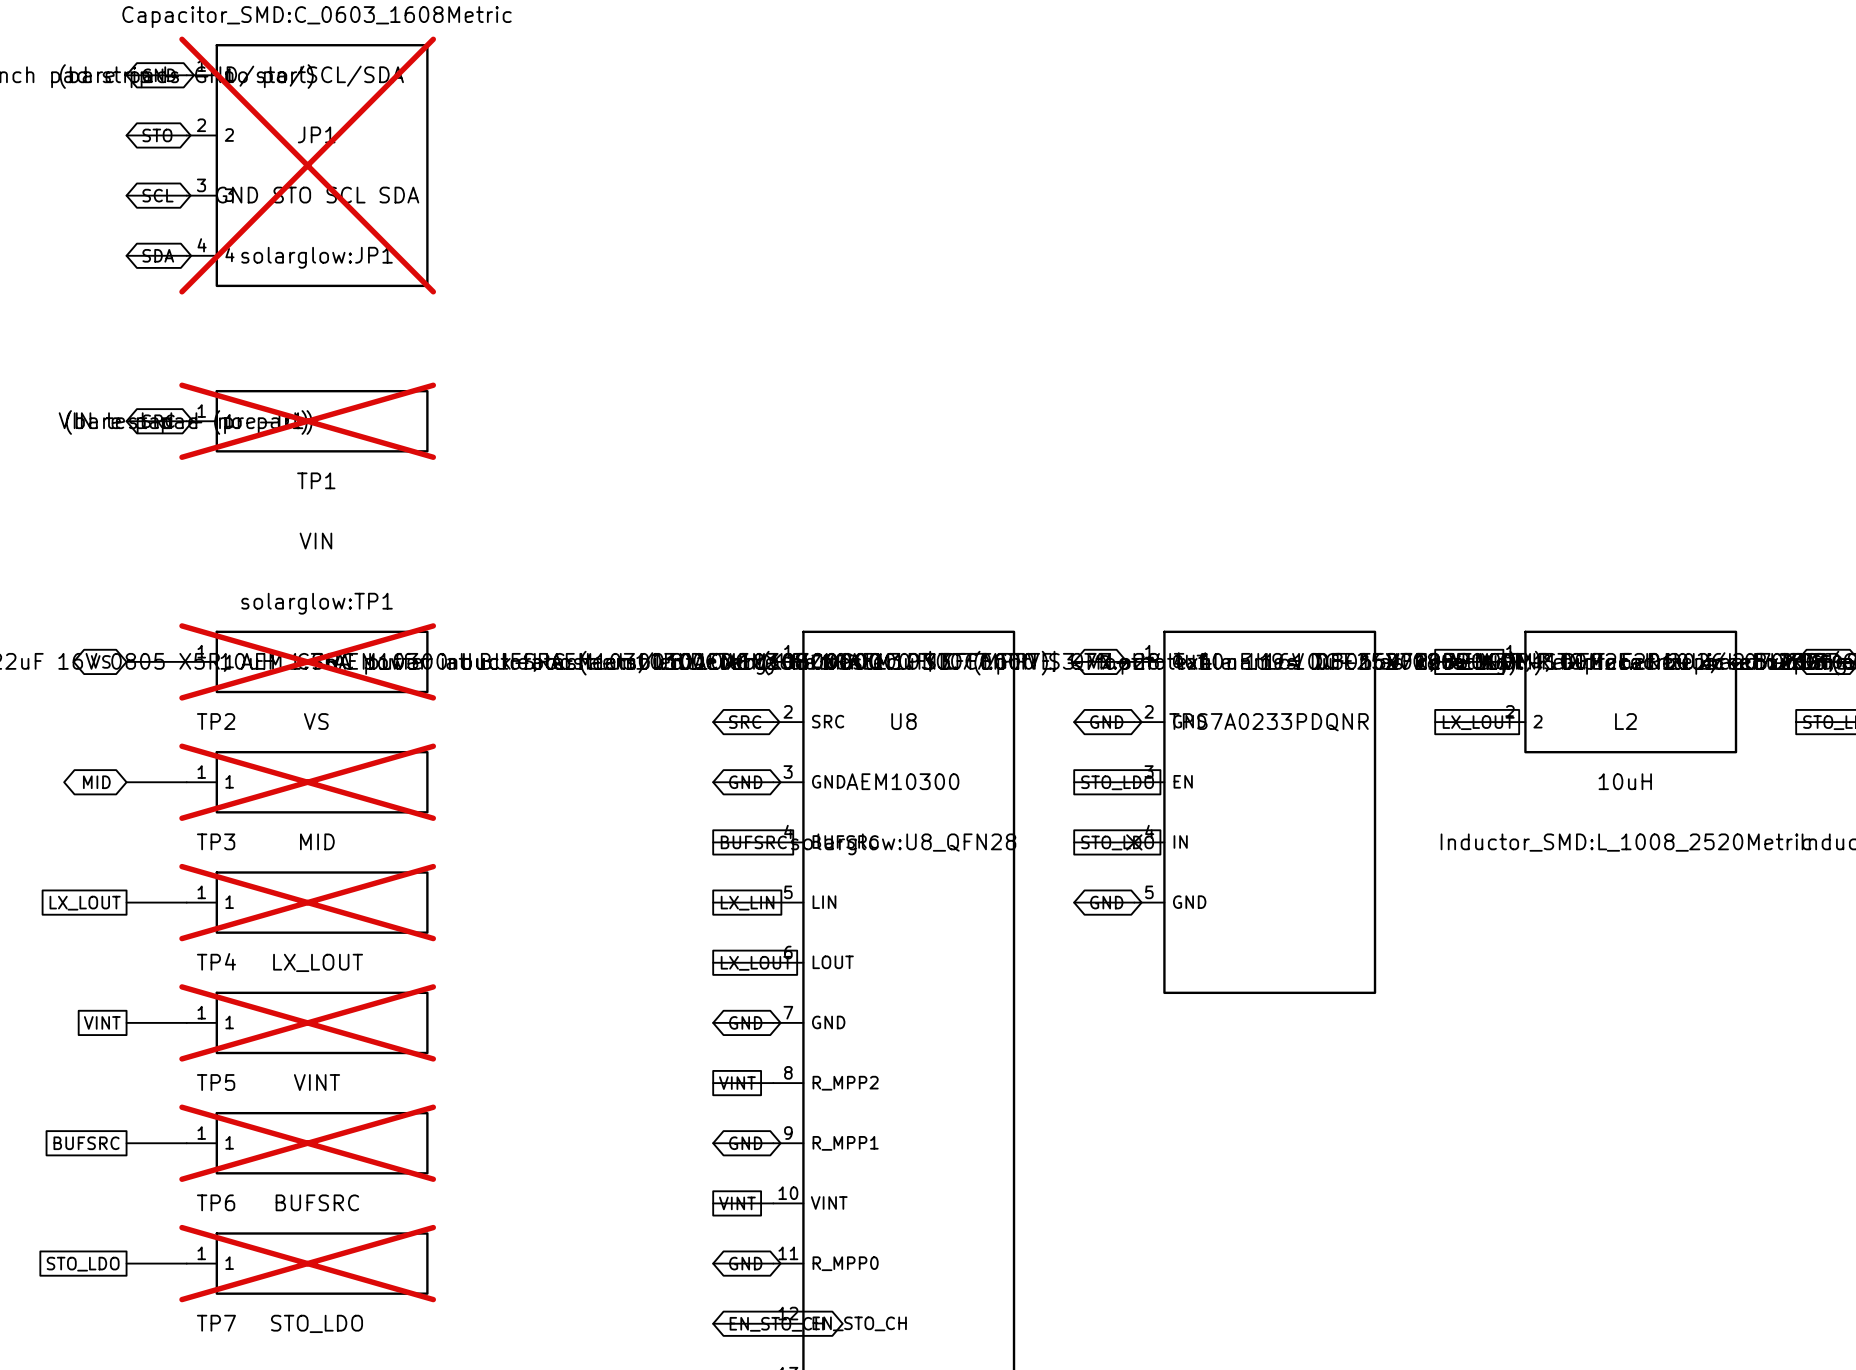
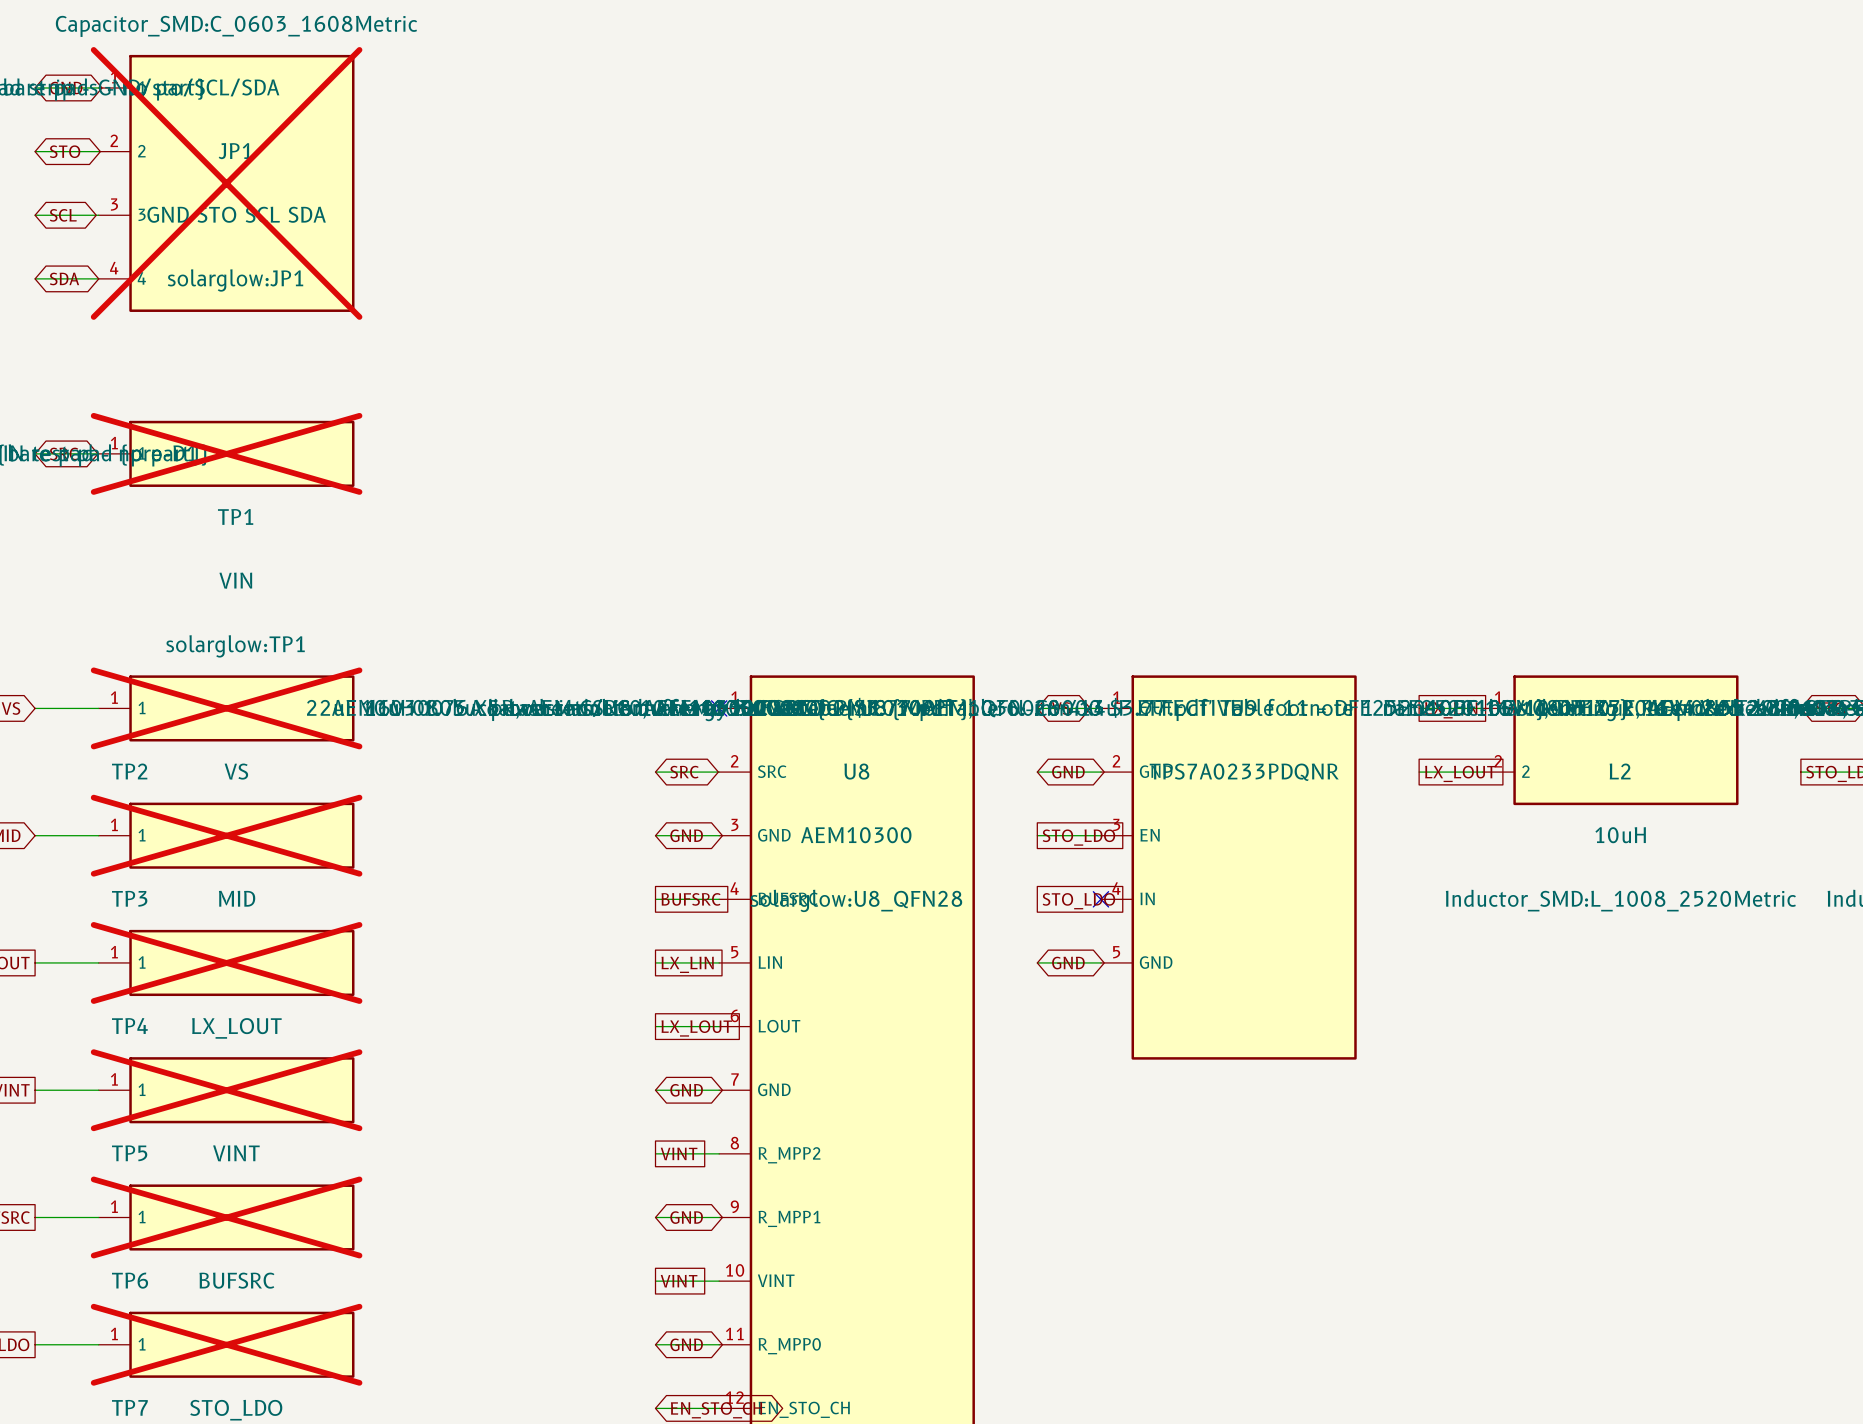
wire: (1074, 842) (1134, 842) -> none

